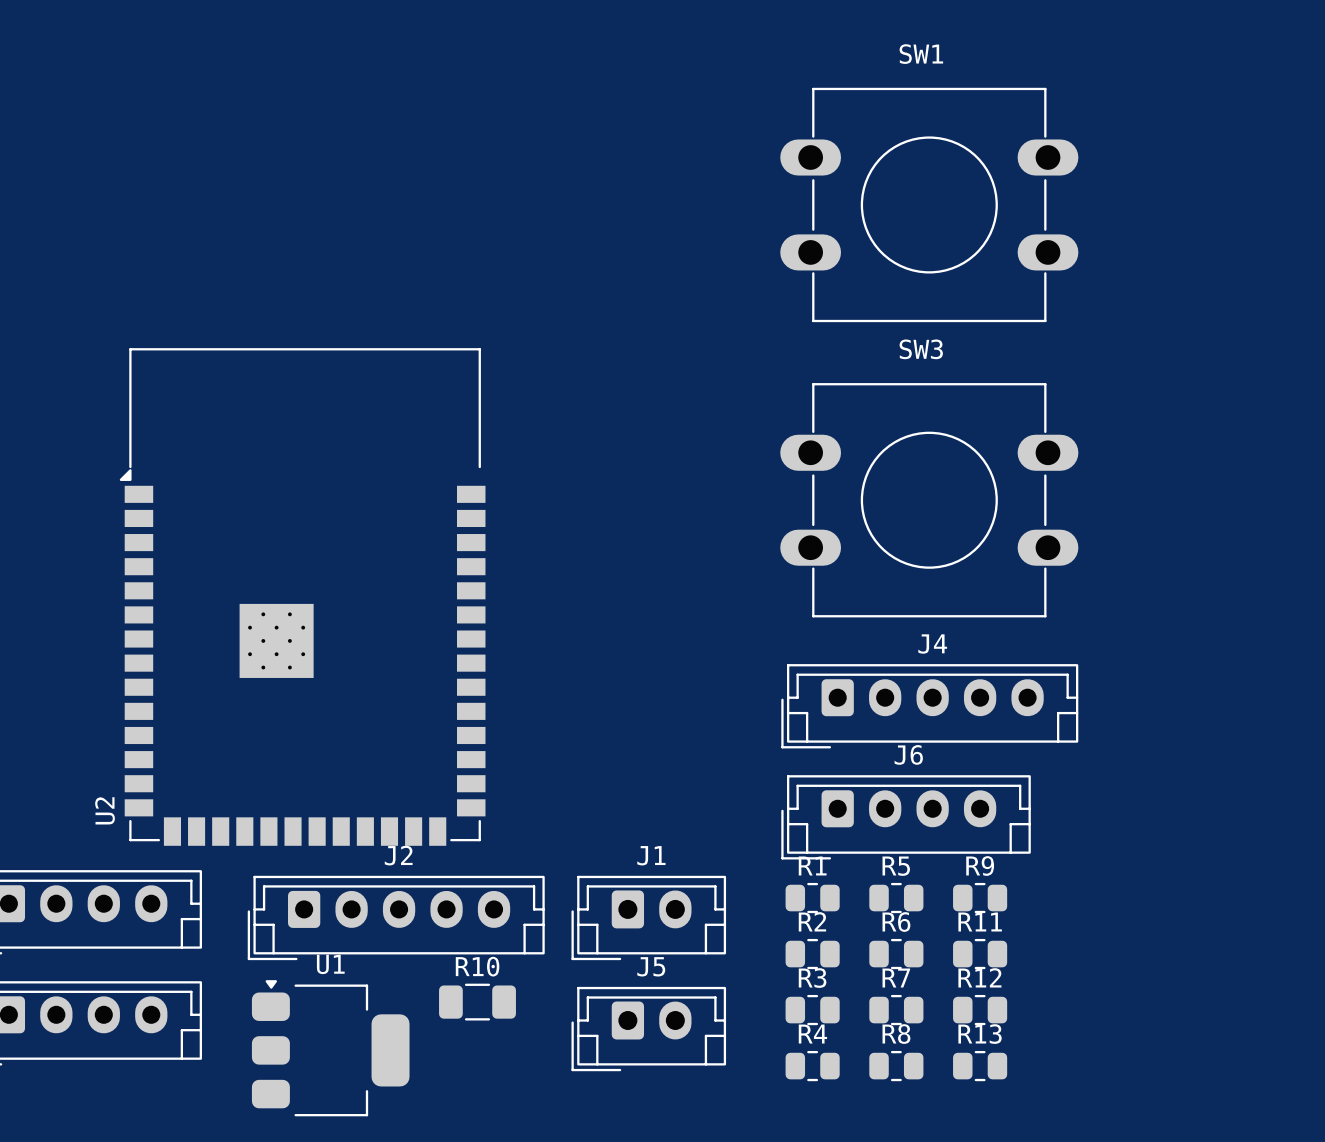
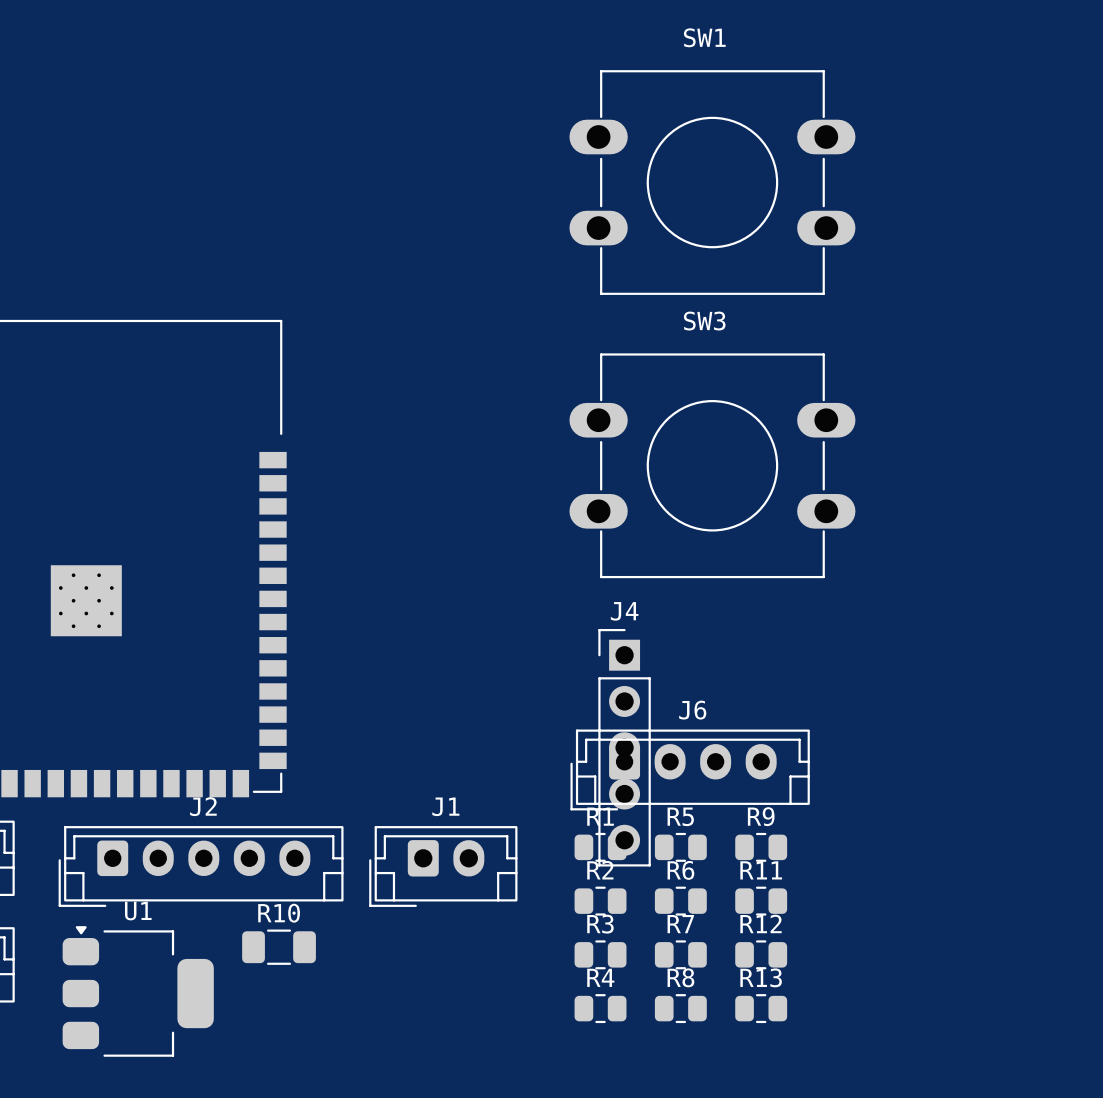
J4 name position: J4 (932, 644) -> J4 (624, 611)
J4 footprint: [781, 664, 1079, 749] -> [598, 628, 651, 867]
J5: (648, 1029) -> none

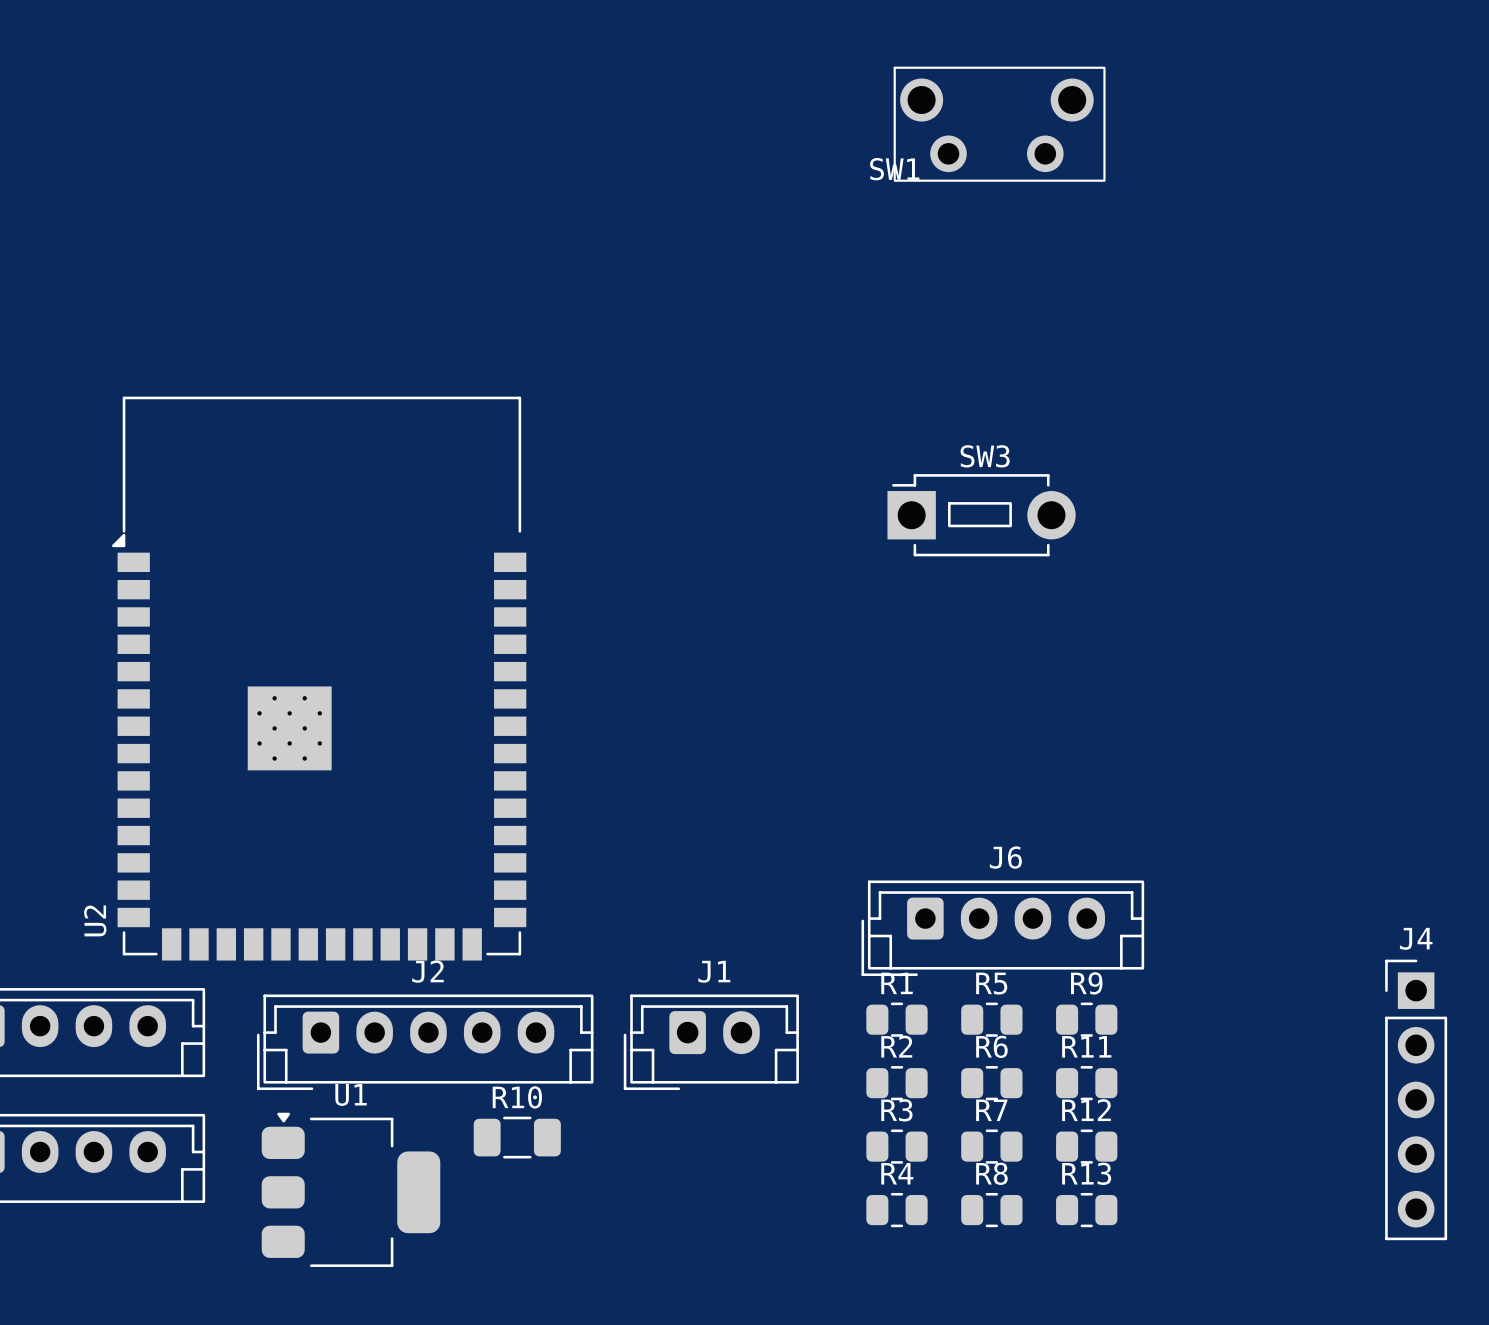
SW1 name position: SW1 (704, 37) -> SW1 (894, 169)
SW1 footprint: [569, 70, 856, 295] -> [893, 66, 1106, 182]
SW3 name position: SW3 (704, 321) -> SW3 (985, 456)
SW3 footprint: [569, 353, 856, 579] -> [887, 474, 1076, 557]
J4 position: (624, 747) -> (1416, 1099)

